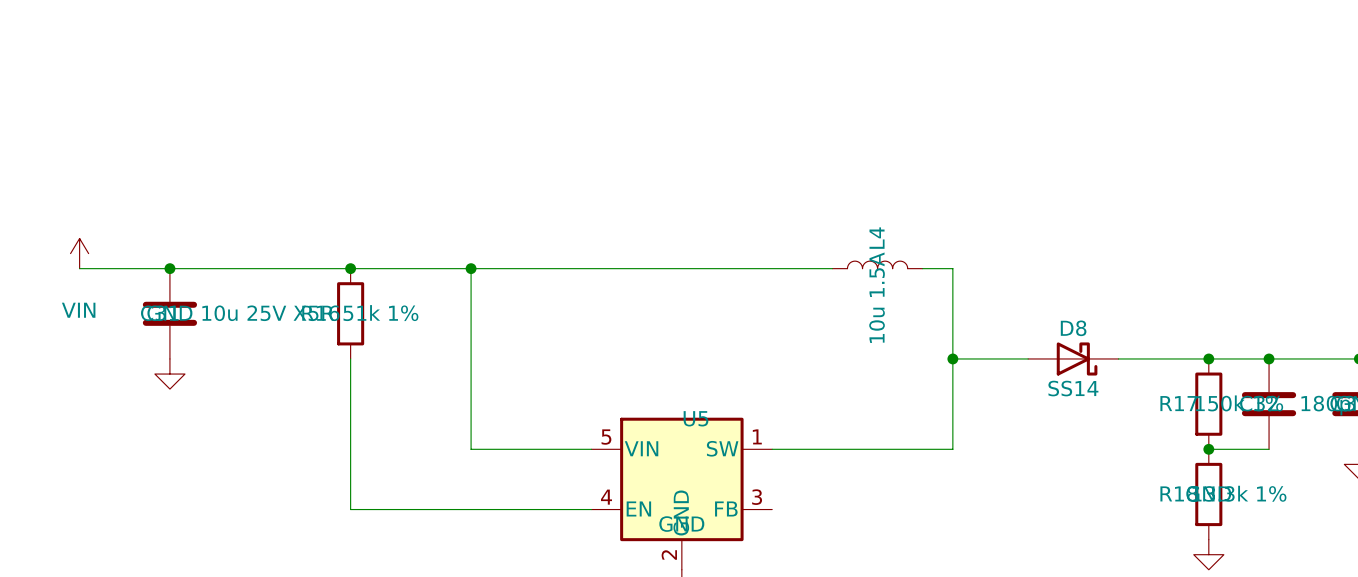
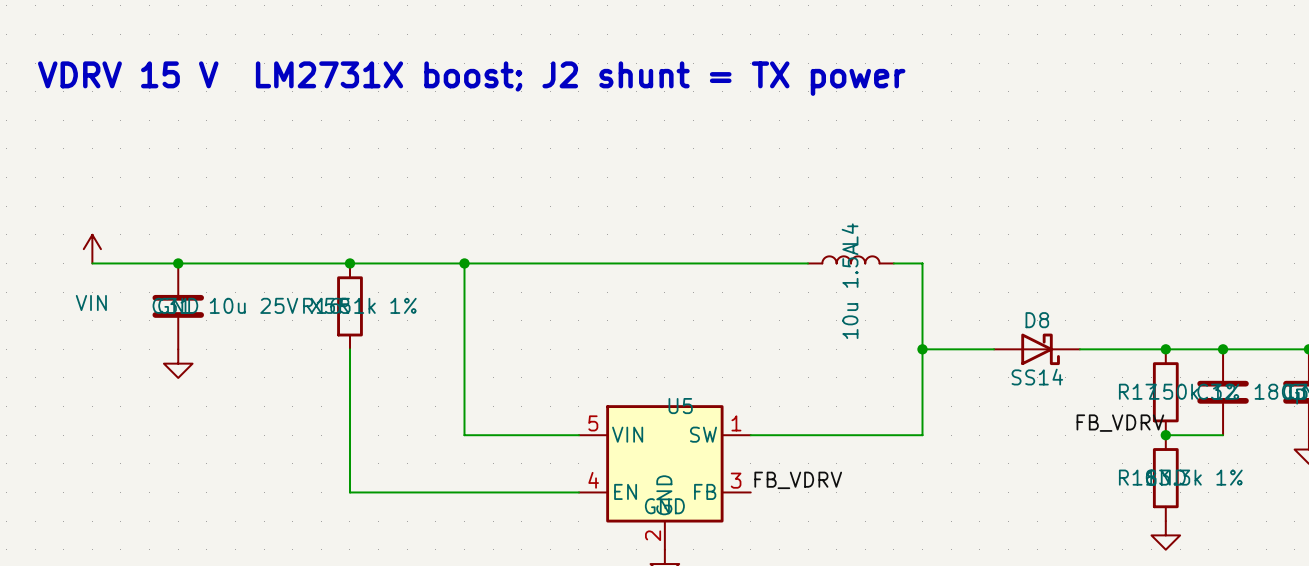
text: none -> VDRV 15 V LM2731X boost; J2 shunt = TX power (471, 78)
label: none -> FB_VDRV (1120, 423)
label: none -> FB_VDRV (798, 480)

